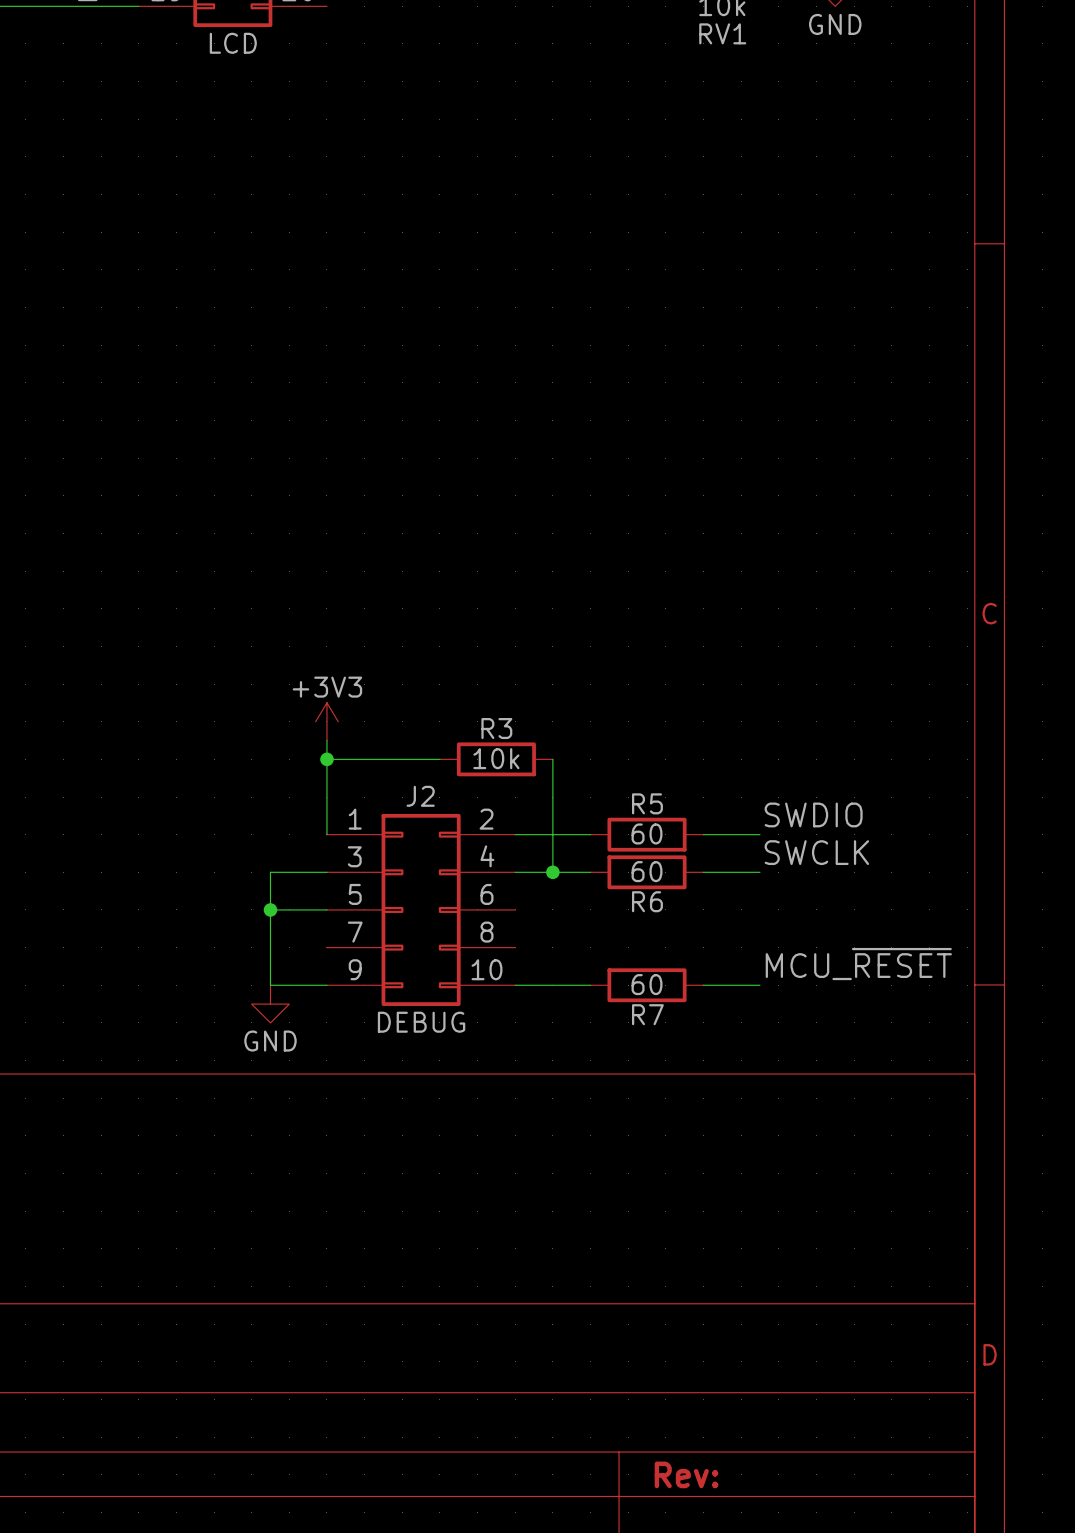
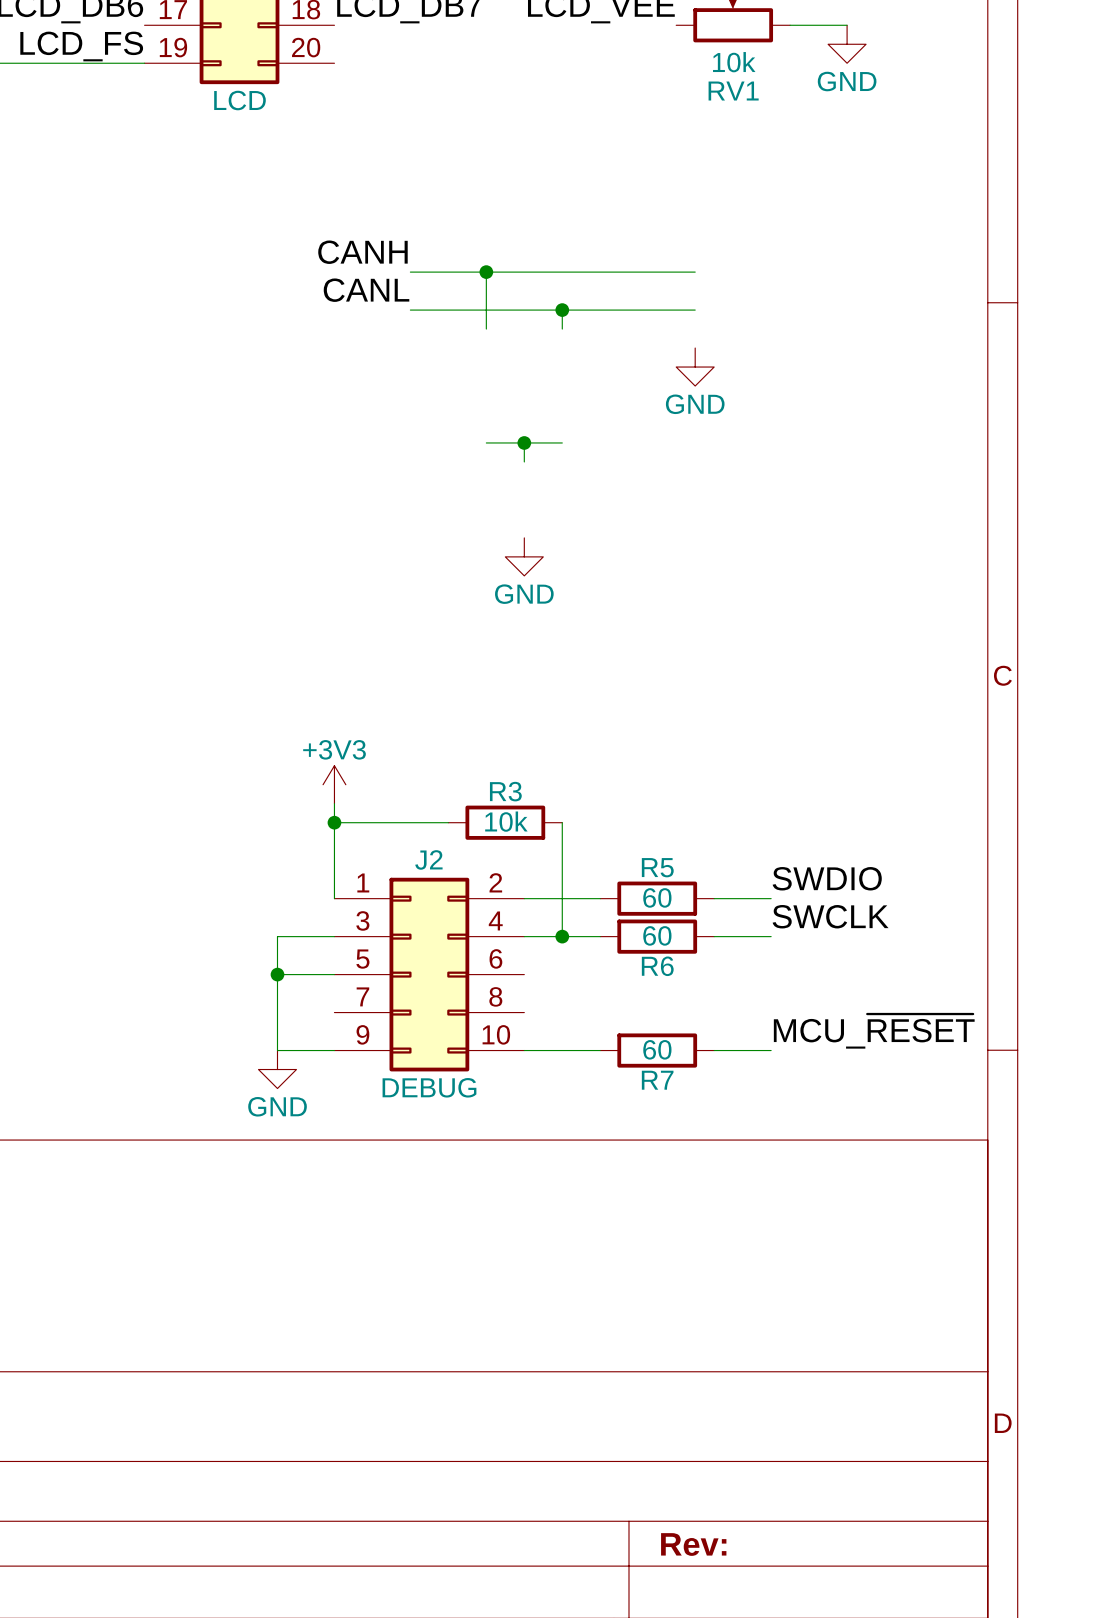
label: none -> CANH (362, 252)
wire: none -> (410, 272) (695, 272)
wire: none -> (486, 272) (486, 329)
junction: none -> (486, 272)
label: none -> CANL (366, 290)
wire: none -> (410, 310) (695, 310)
wire: none -> (562, 310) (562, 329)
junction: none -> (562, 310)
power symbol: none -> GND (695, 367)
wire: none -> (486, 442) (562, 442)
wire: none -> (524, 442) (524, 461)
junction: none -> (524, 442)
power symbol: none -> GND (524, 556)

